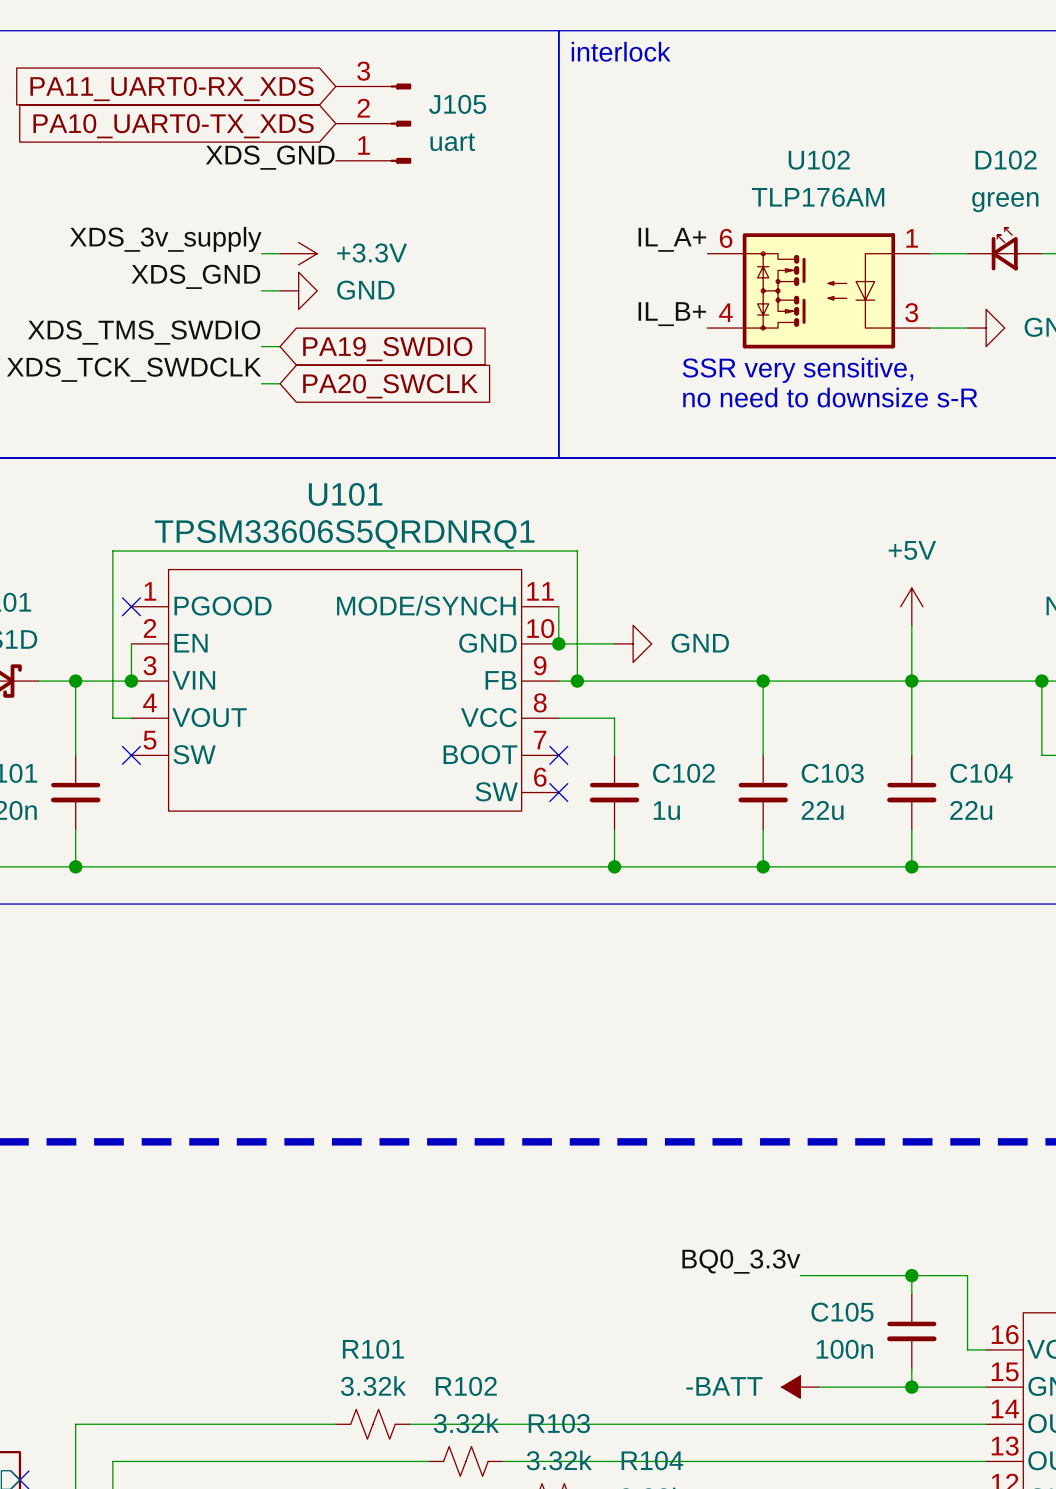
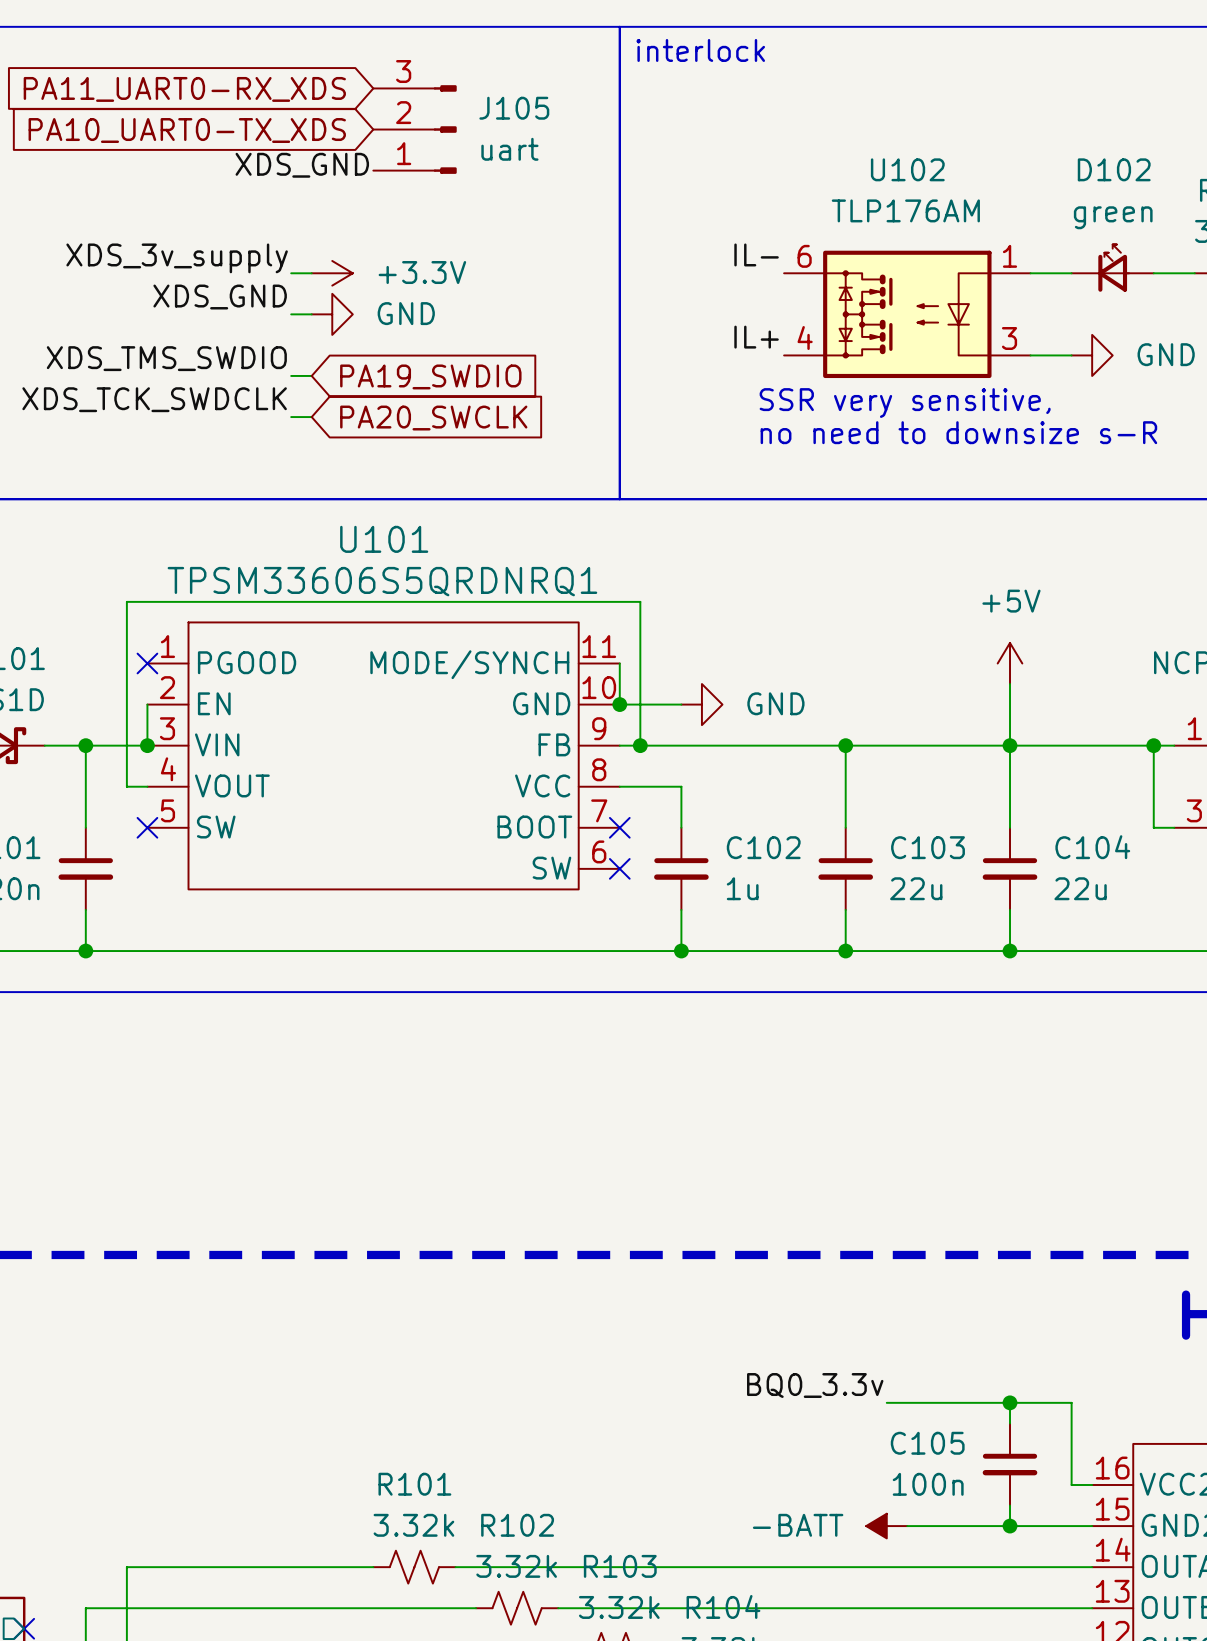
label: IL_A+ (672, 239) -> IL- (756, 254)
label: IL_B+ (672, 314) -> IL+ (756, 337)
wire: (112, 1424) (75, 1424) (75, 1461) -> (126, 1567) (126, 1608) (85, 1608)

